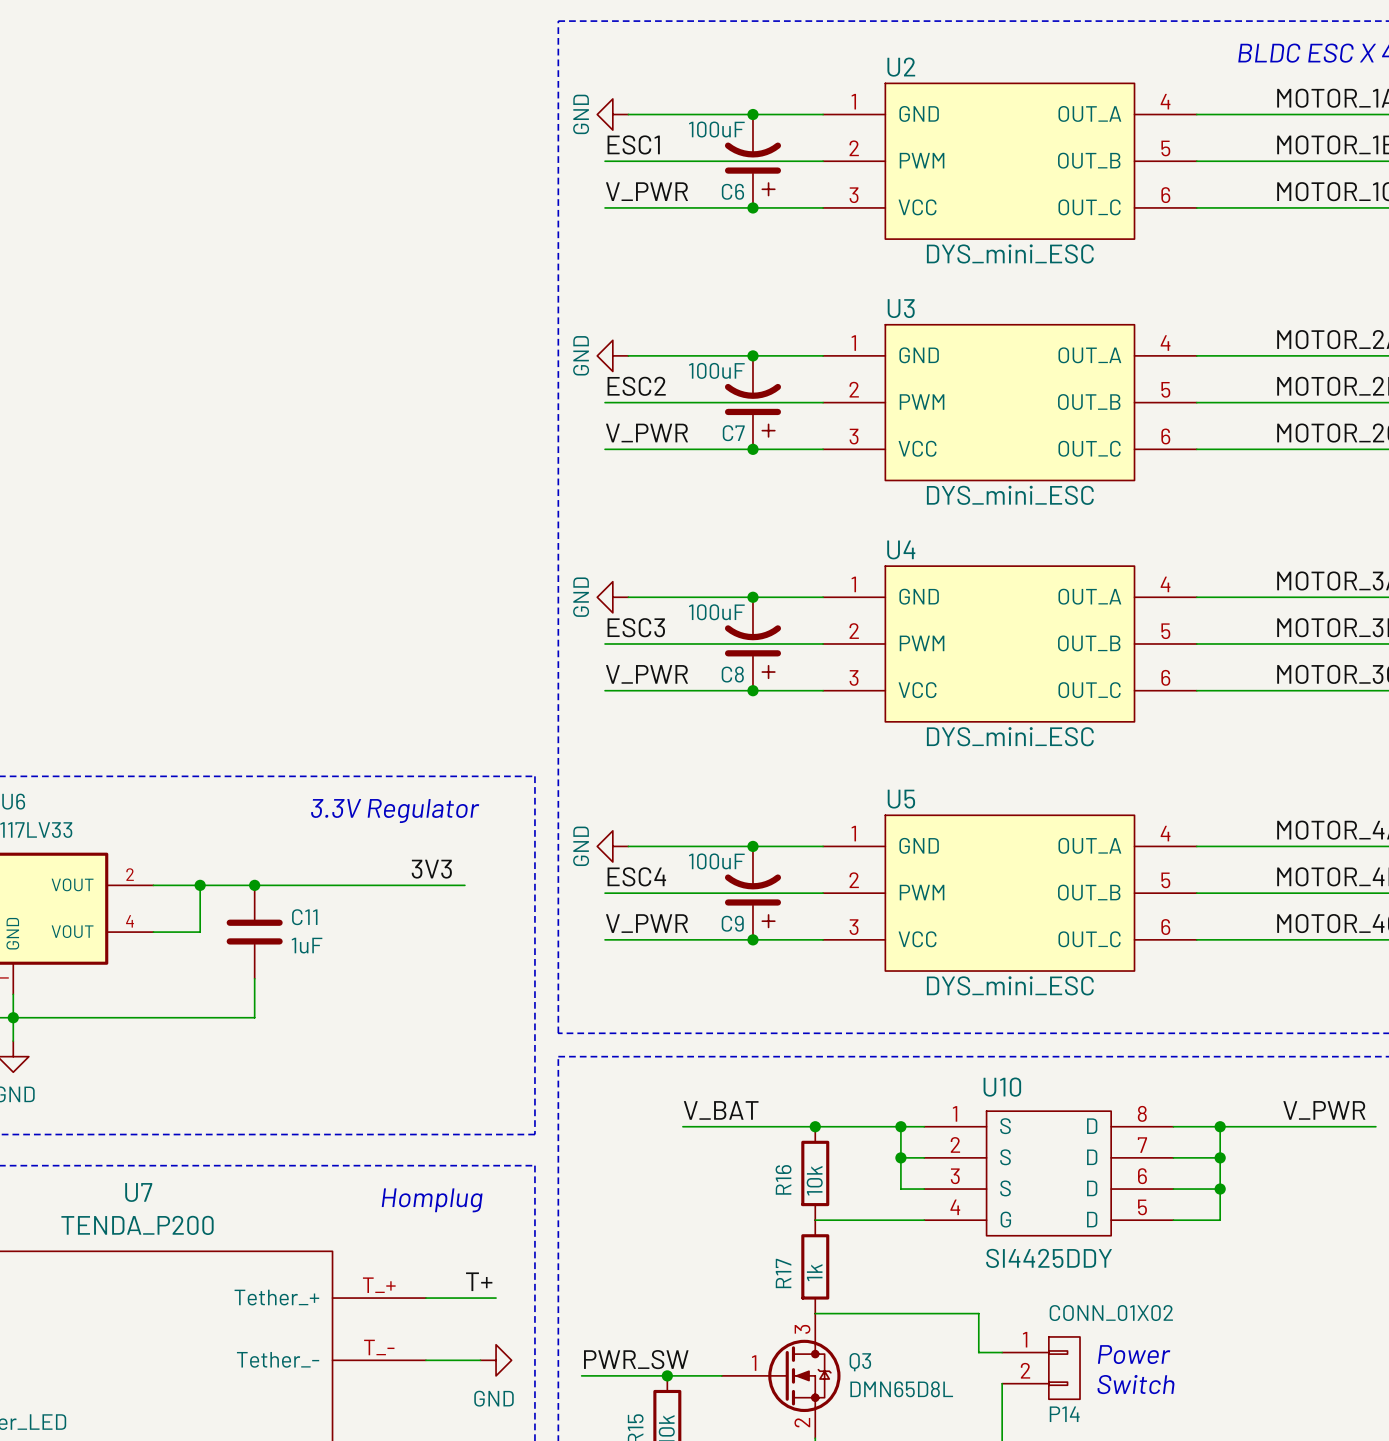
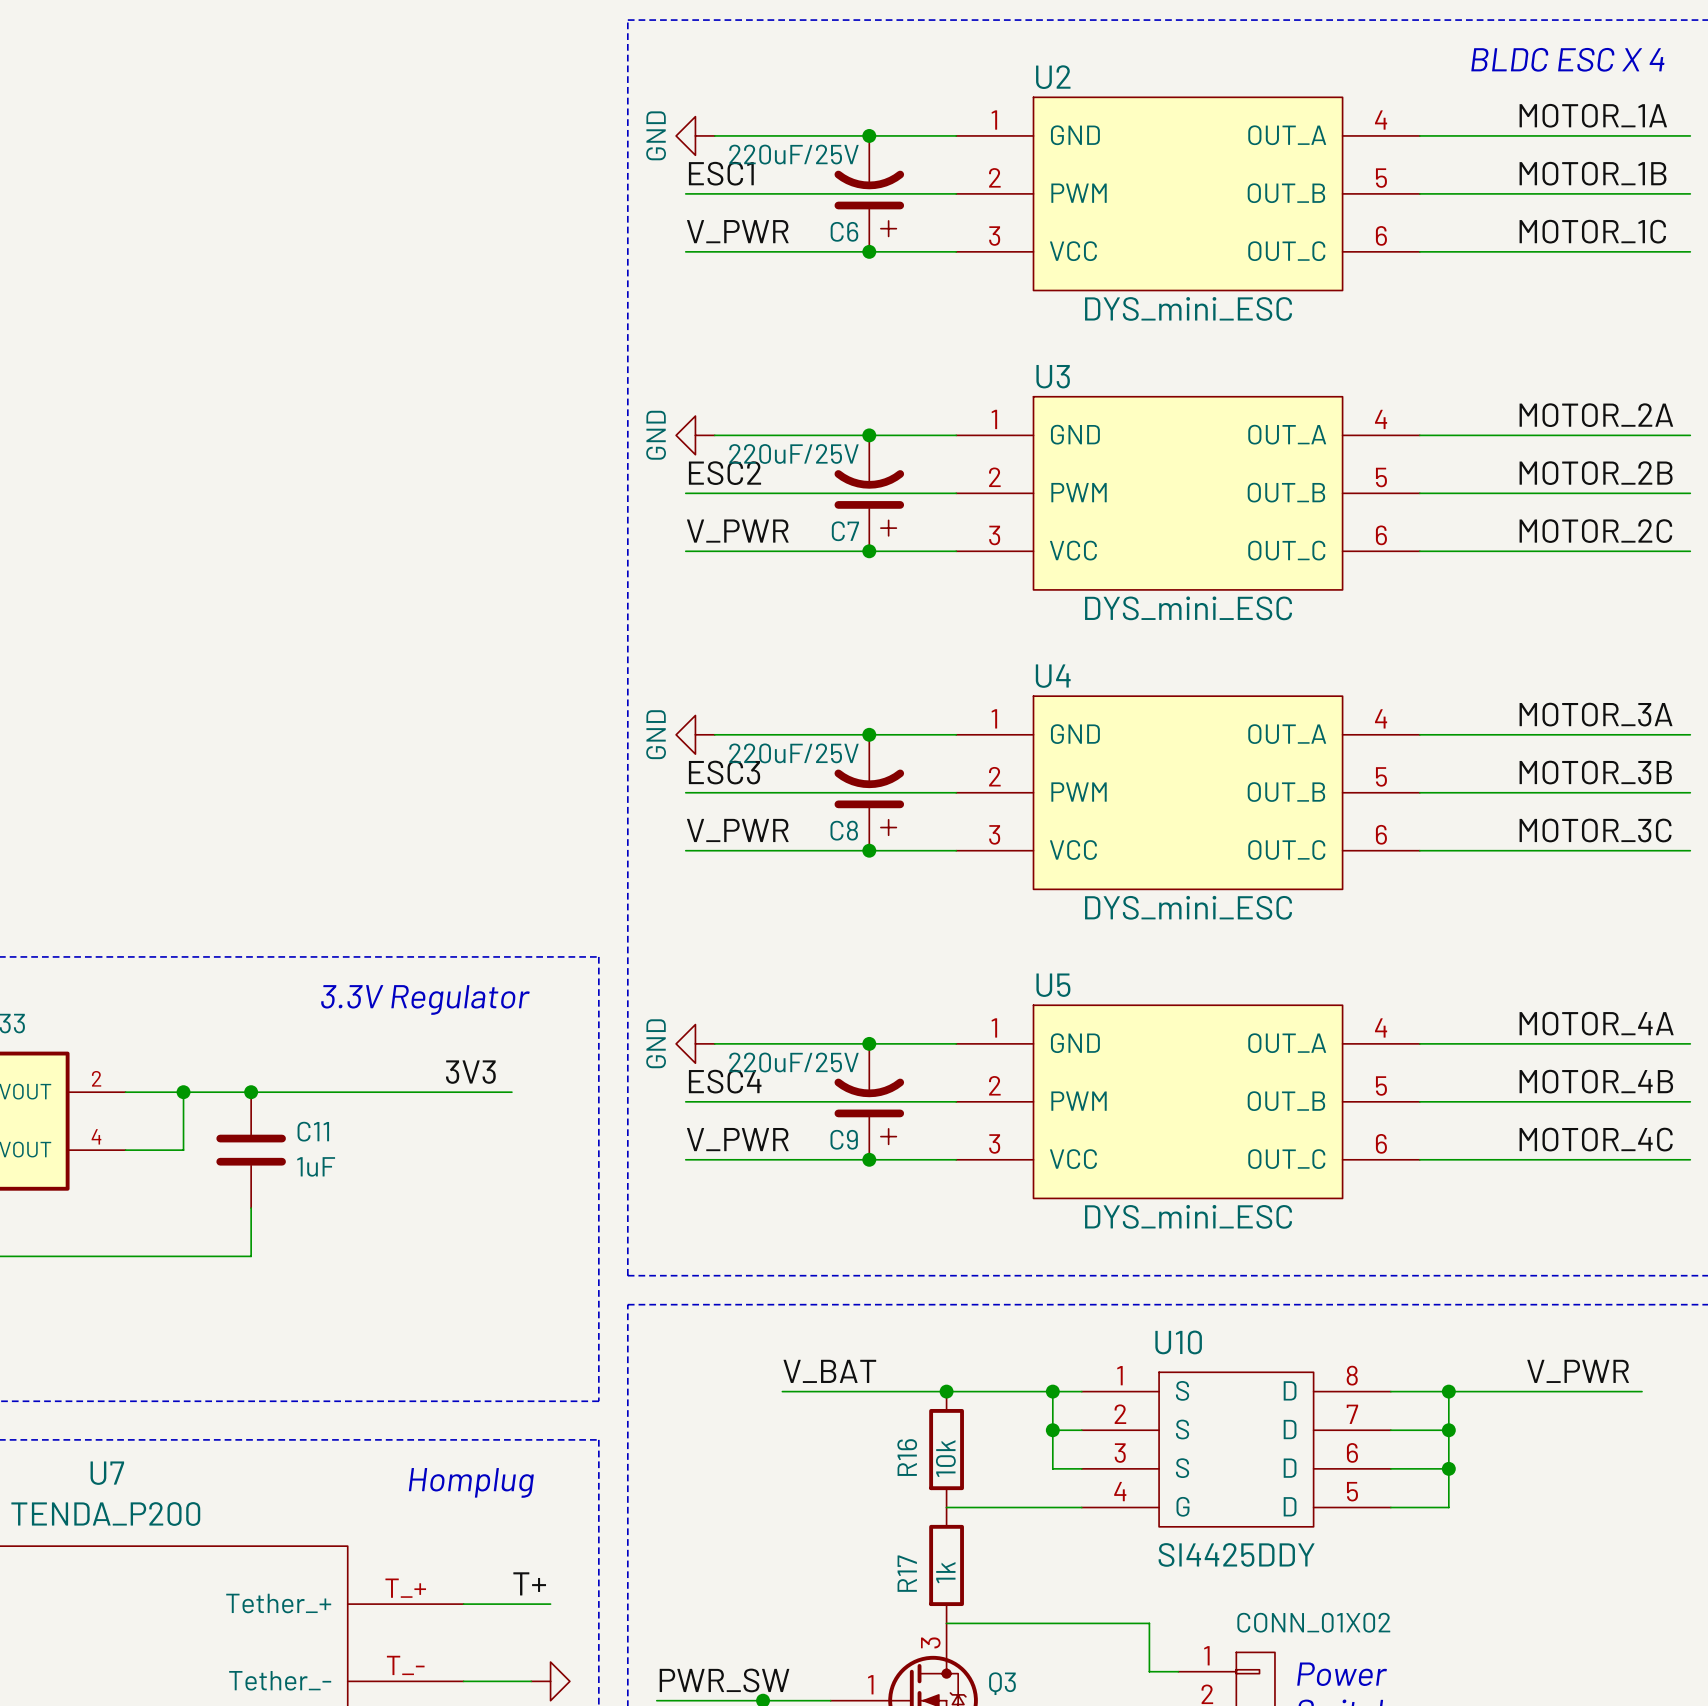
C6 value: 100uF (716, 129) -> 220uF/25V (794, 154)
C7 value: 100uF (716, 370) -> 220uF/25V (794, 453)
C8 value: 100uF (716, 612) -> 220uF/25V (794, 753)
C9 value: 100uF (716, 861) -> 220uF/25V (794, 1062)

